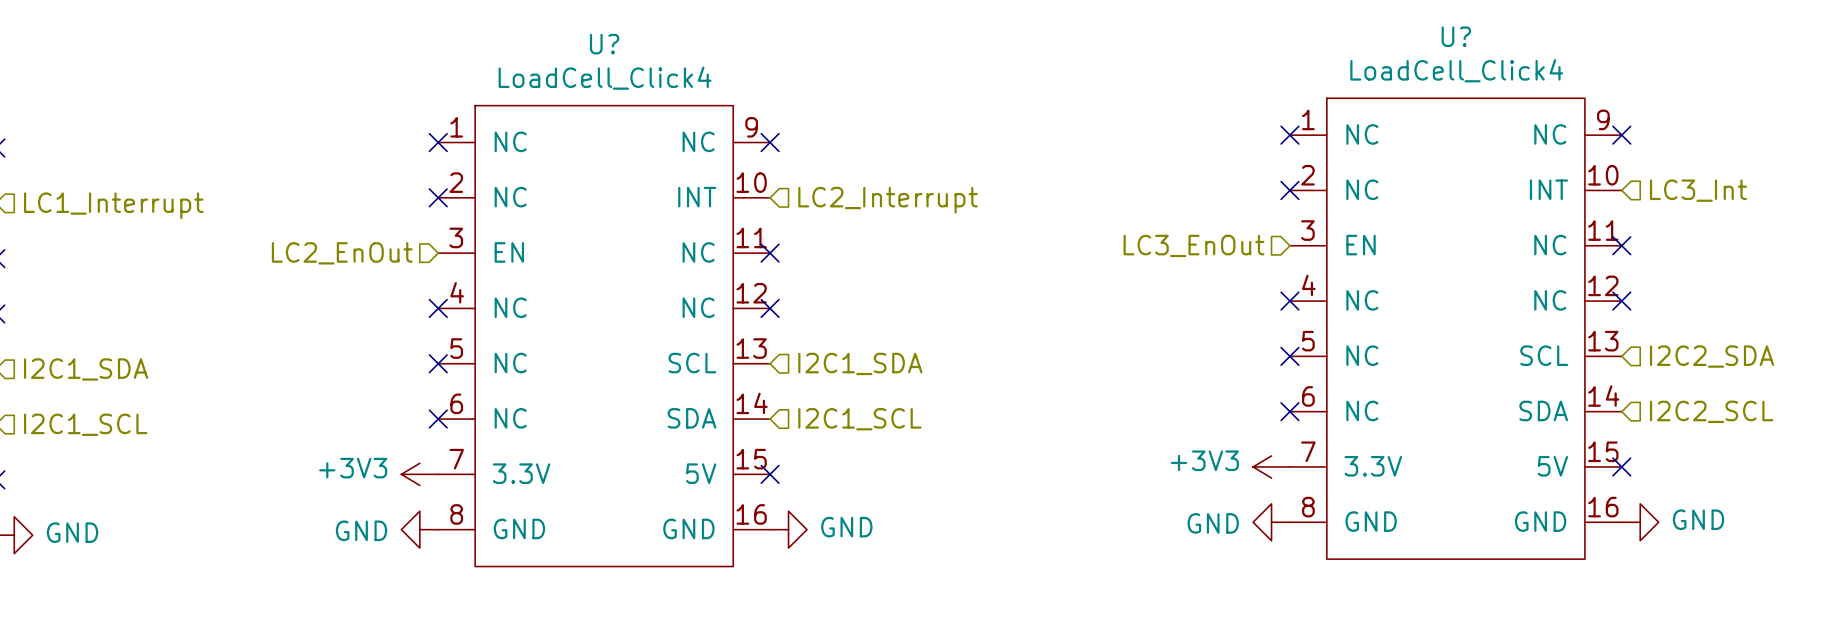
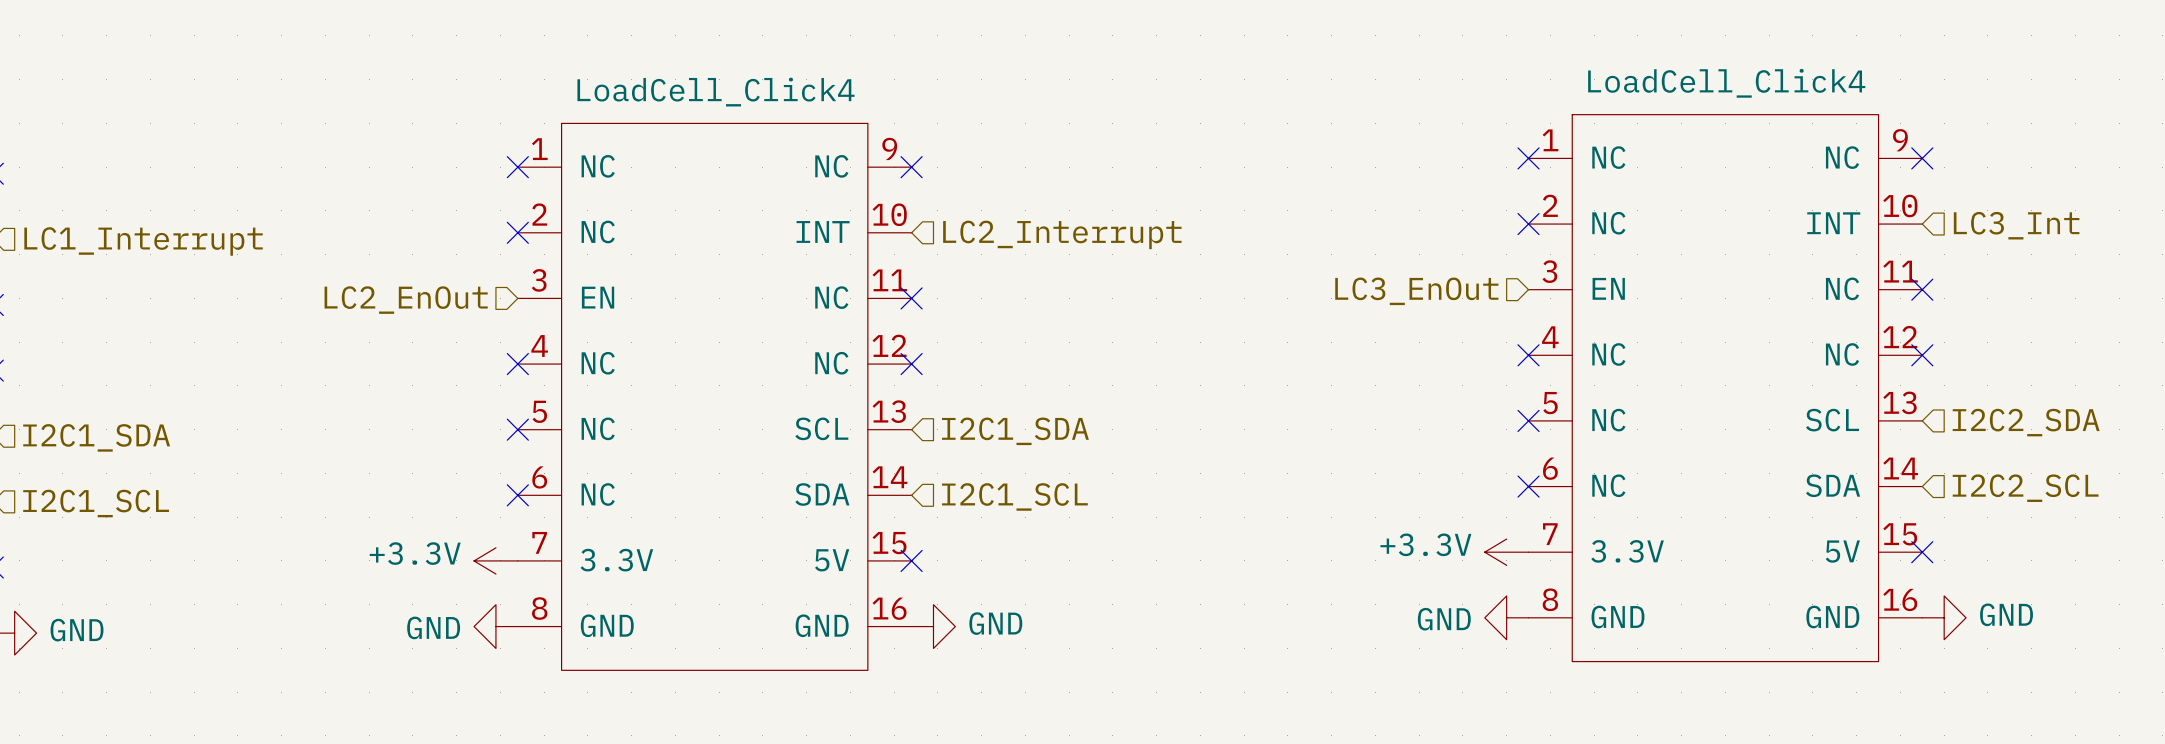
U? name: U? (1456, 36) -> none
U? name: U? (604, 44) -> none
power symbol: +3V3 (1271, 466) -> +3.3V (1506, 552)
power symbol: +3V3 (419, 474) -> +3.3V (495, 560)

